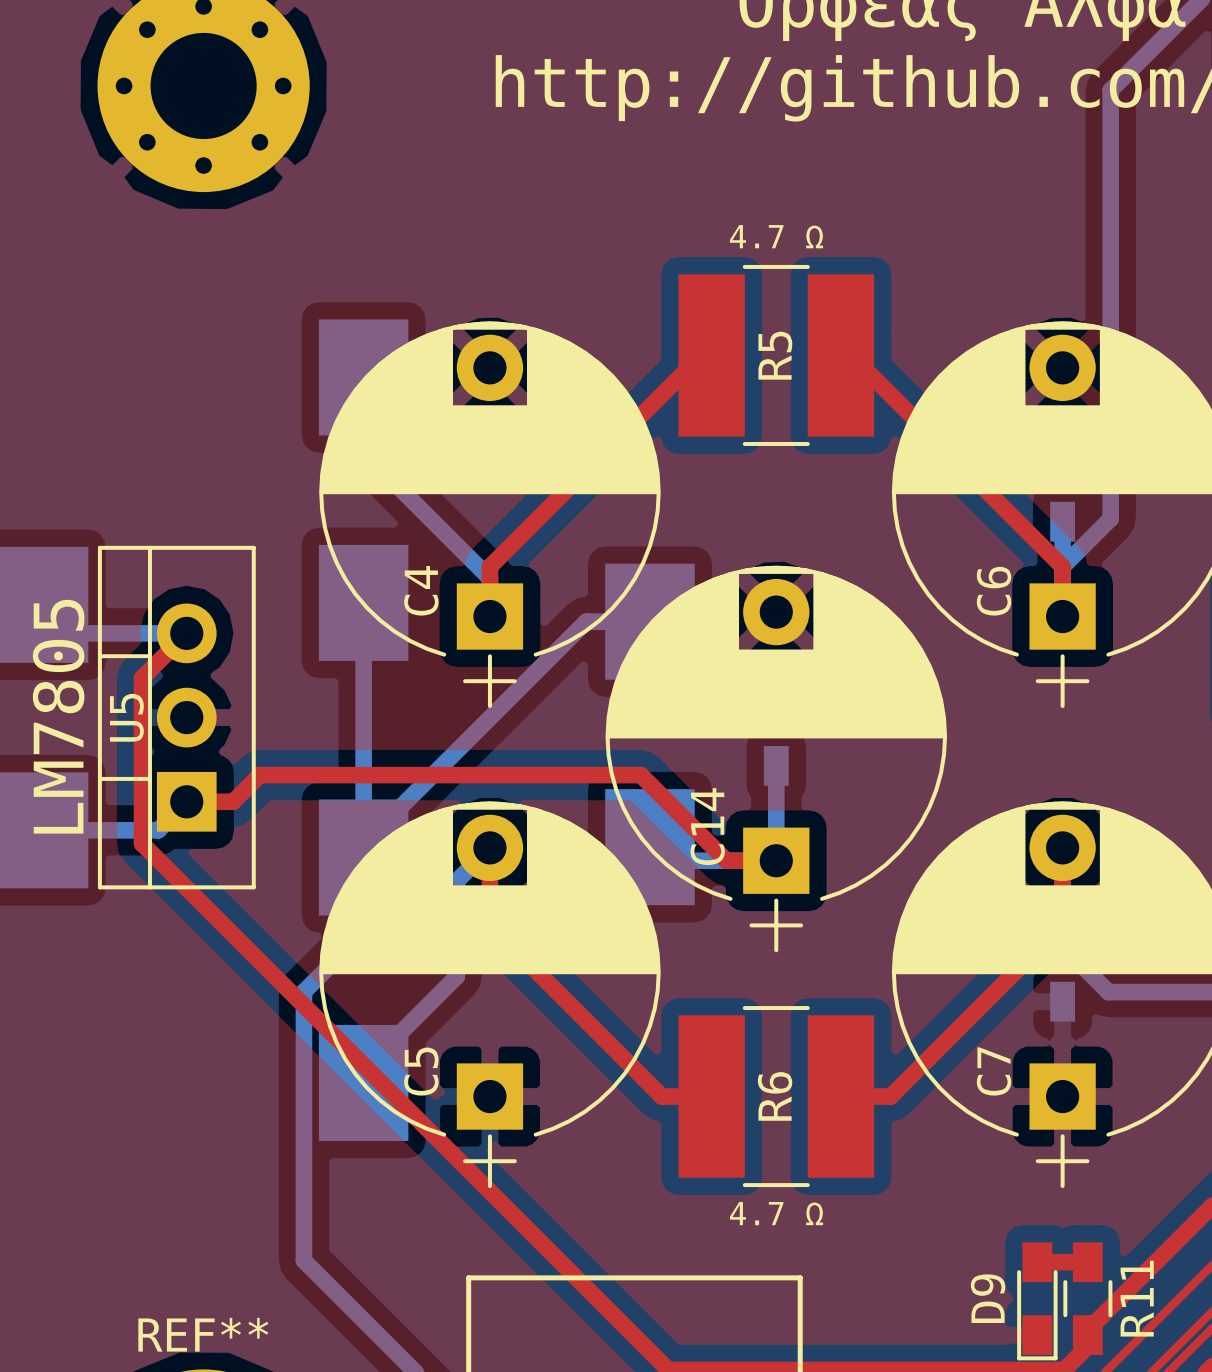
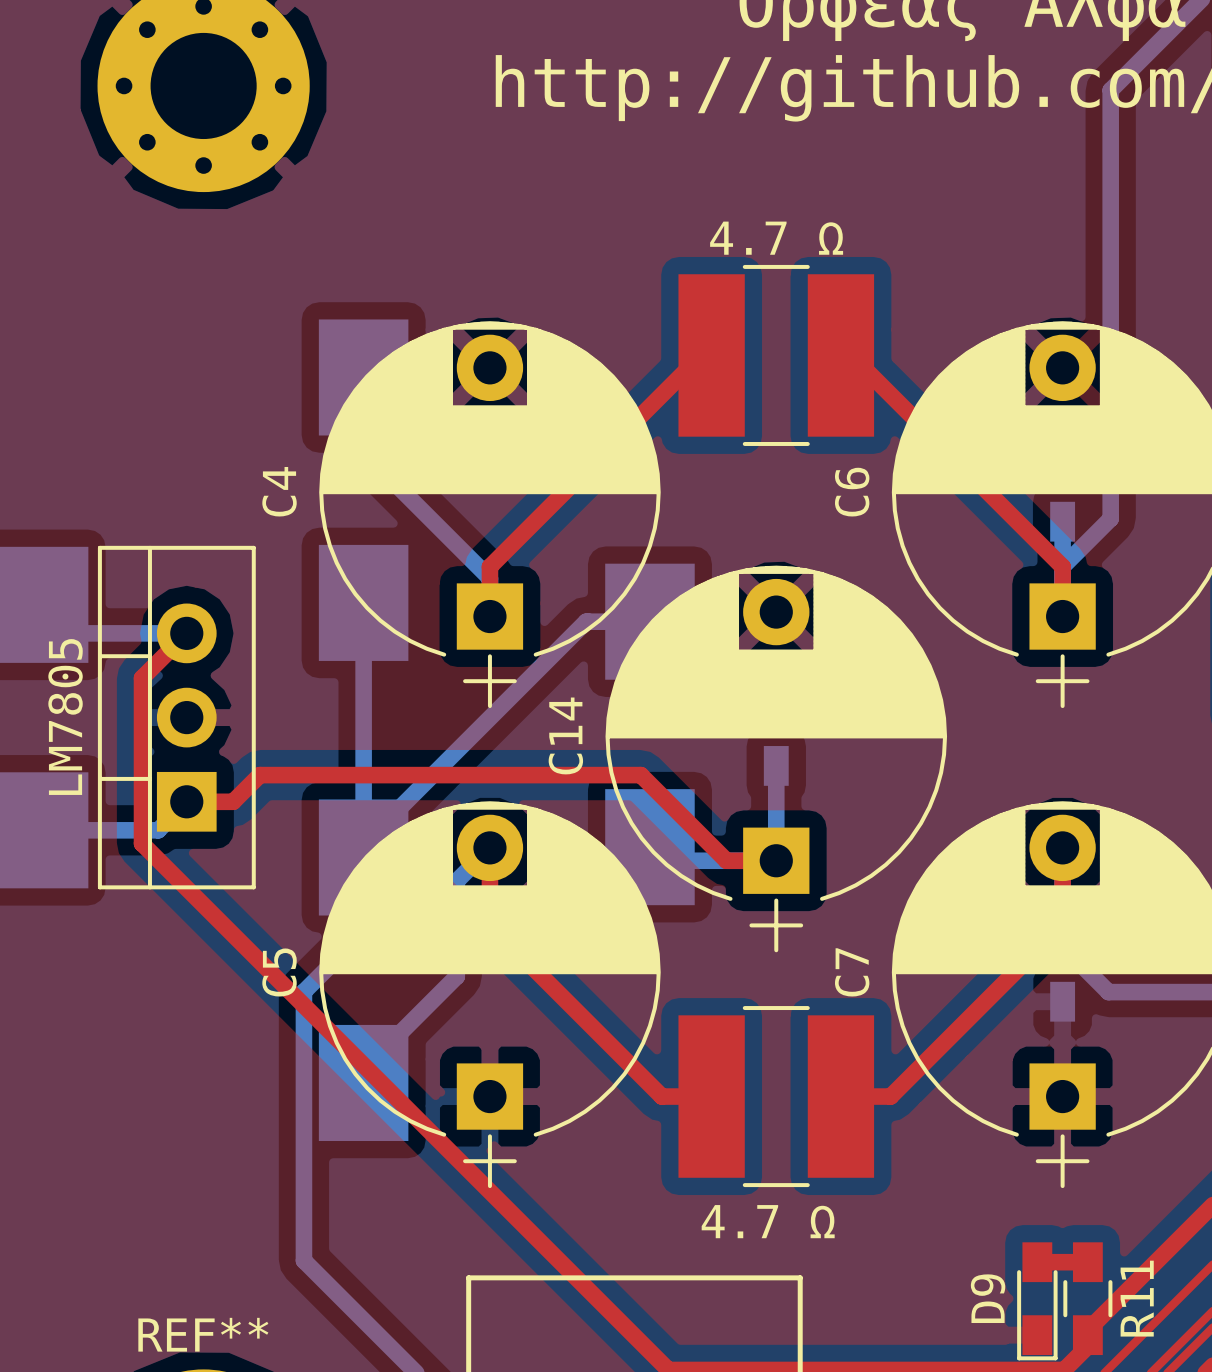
text: 4.7 Ω (776, 236) -> none
R5 name: R5 (775, 355) -> 4.7 Ω (776, 238)
C4 name position: C4 (421, 590) -> C4 (279, 491)
C6 name position: C6 (994, 591) -> C6 (852, 492)
text: LM7805 (58, 716) -> none
U5 name: U5 (126, 717) -> LM7805 (65, 717)
C14 name position: C14 (707, 826) -> C14 (565, 735)
C5 name position: C5 (421, 1071) -> C5 (279, 972)
C7 name position: C7 (994, 1071) -> C7 (852, 972)
R6 name: R6 (775, 1096) -> 4.7 Ω (768, 1221)
text: 4.7 Ω (776, 1213) -> none

